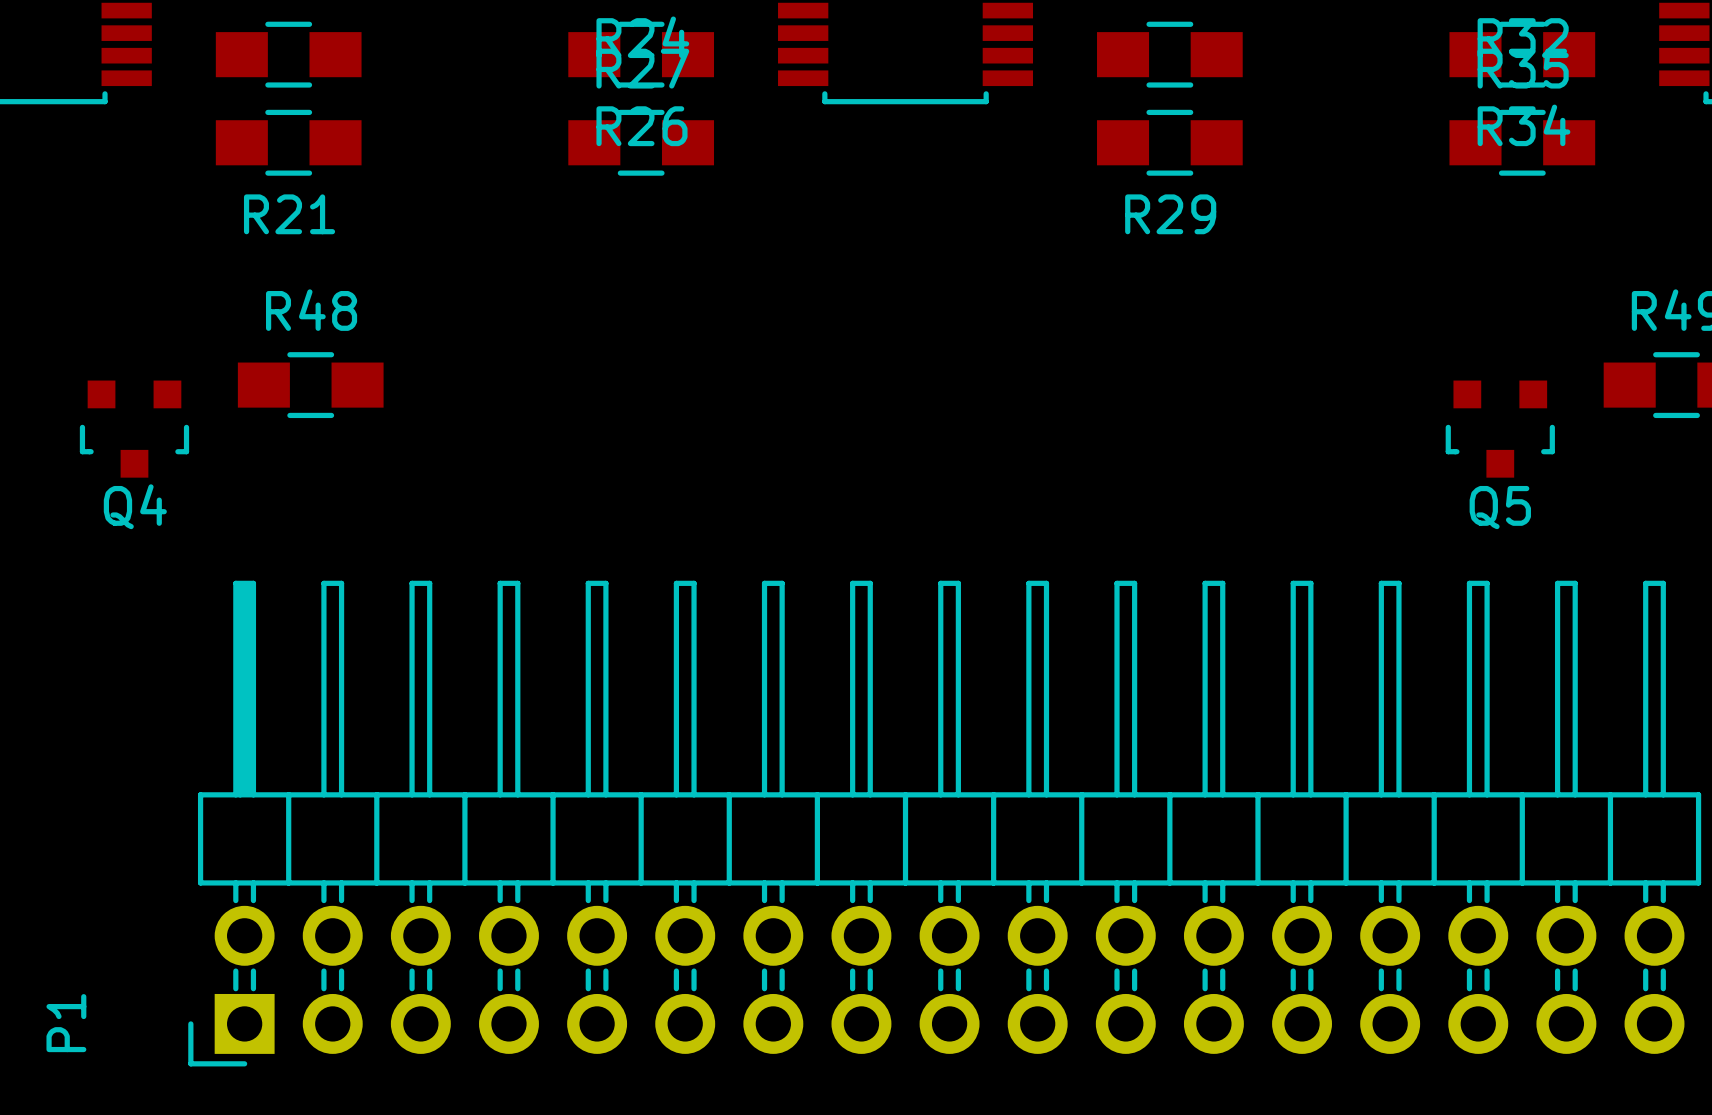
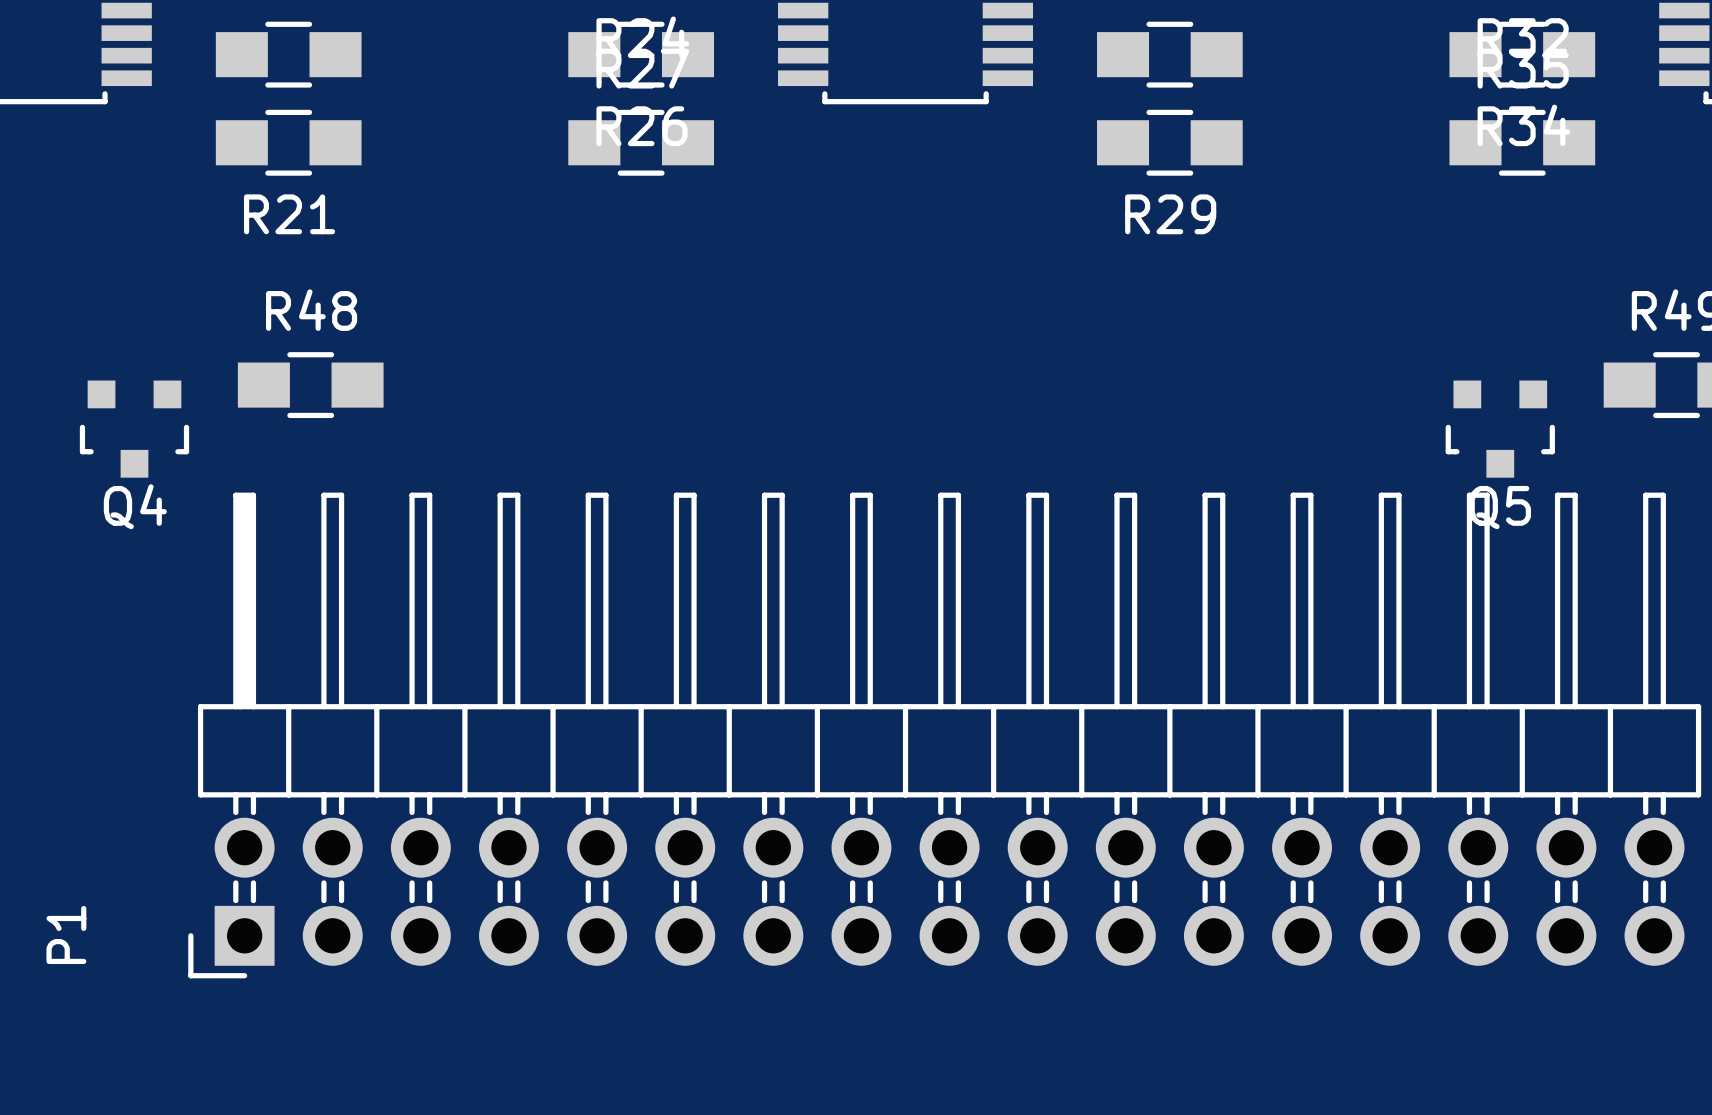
P1 position: (944, 823) -> (944, 735)

